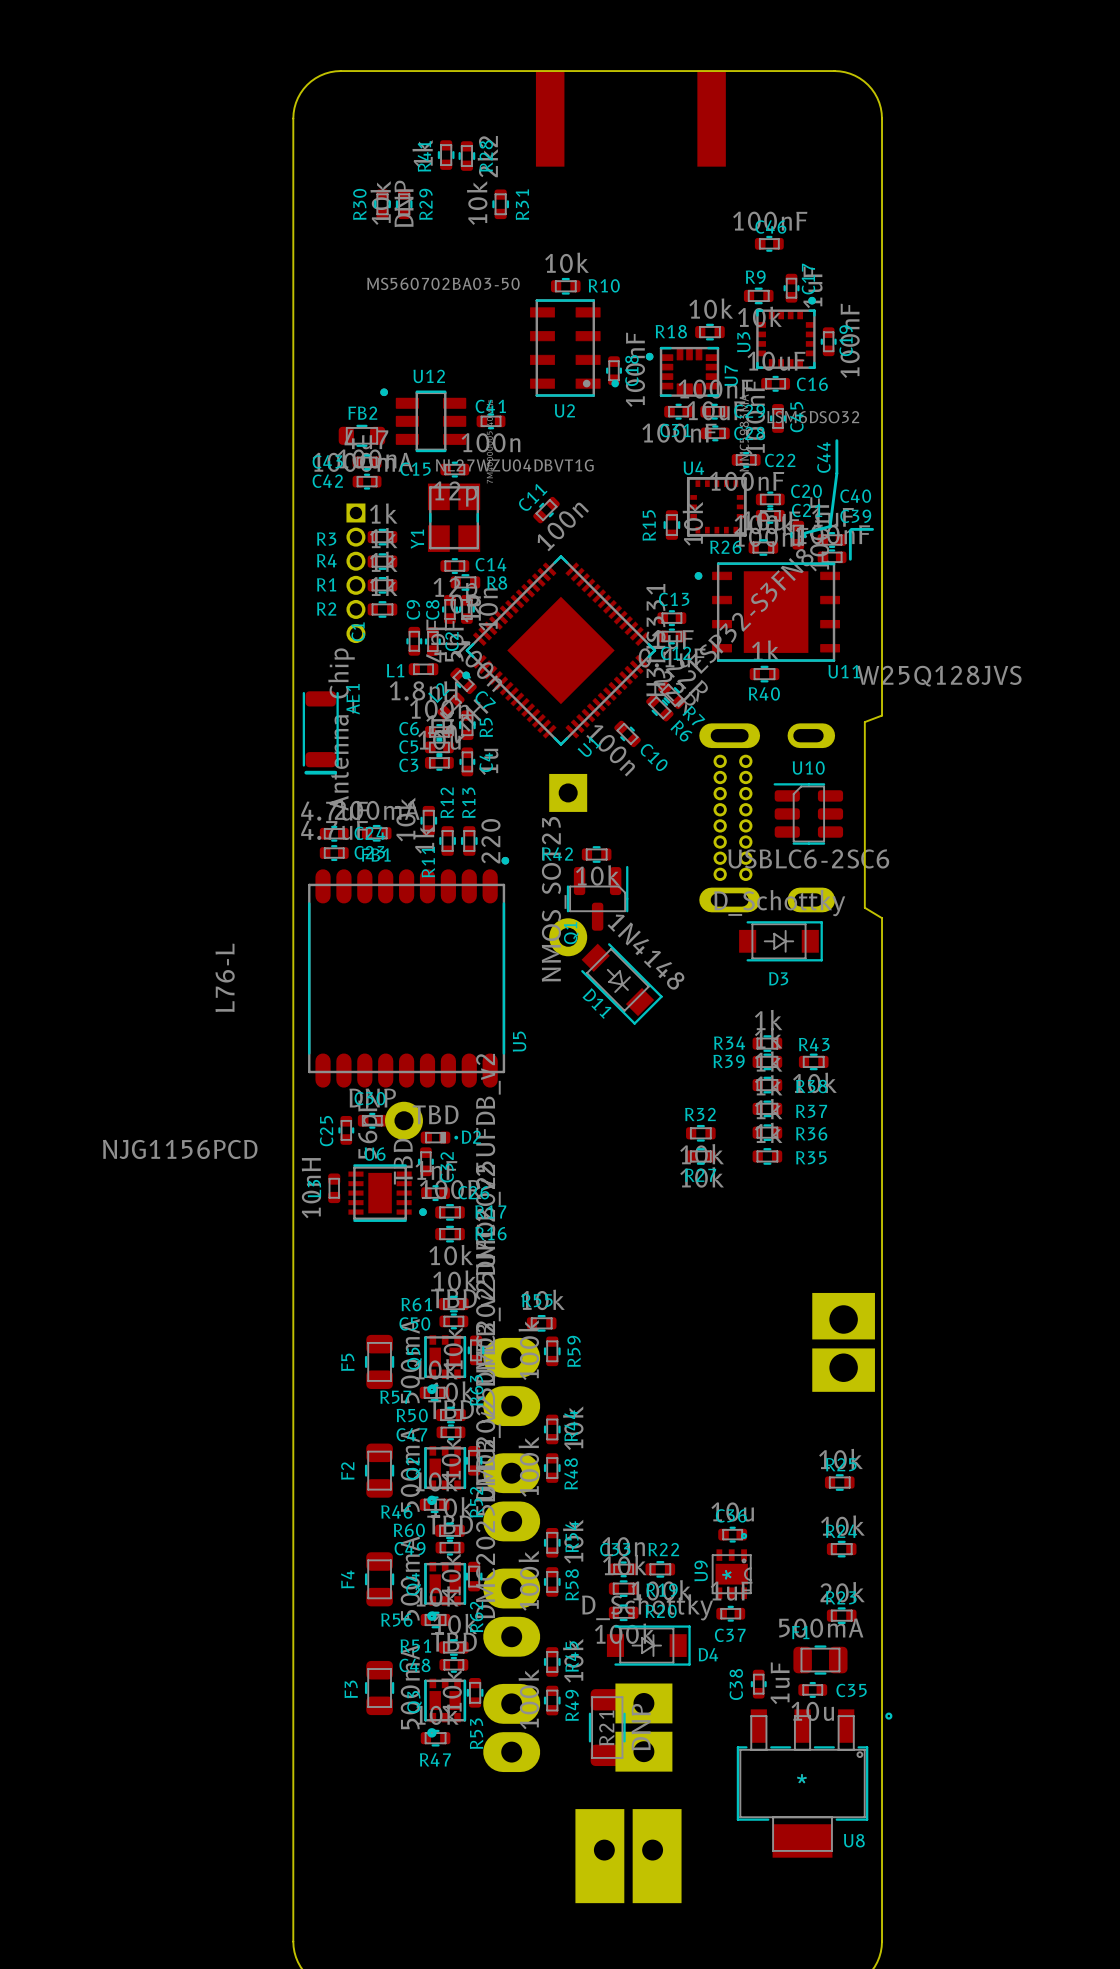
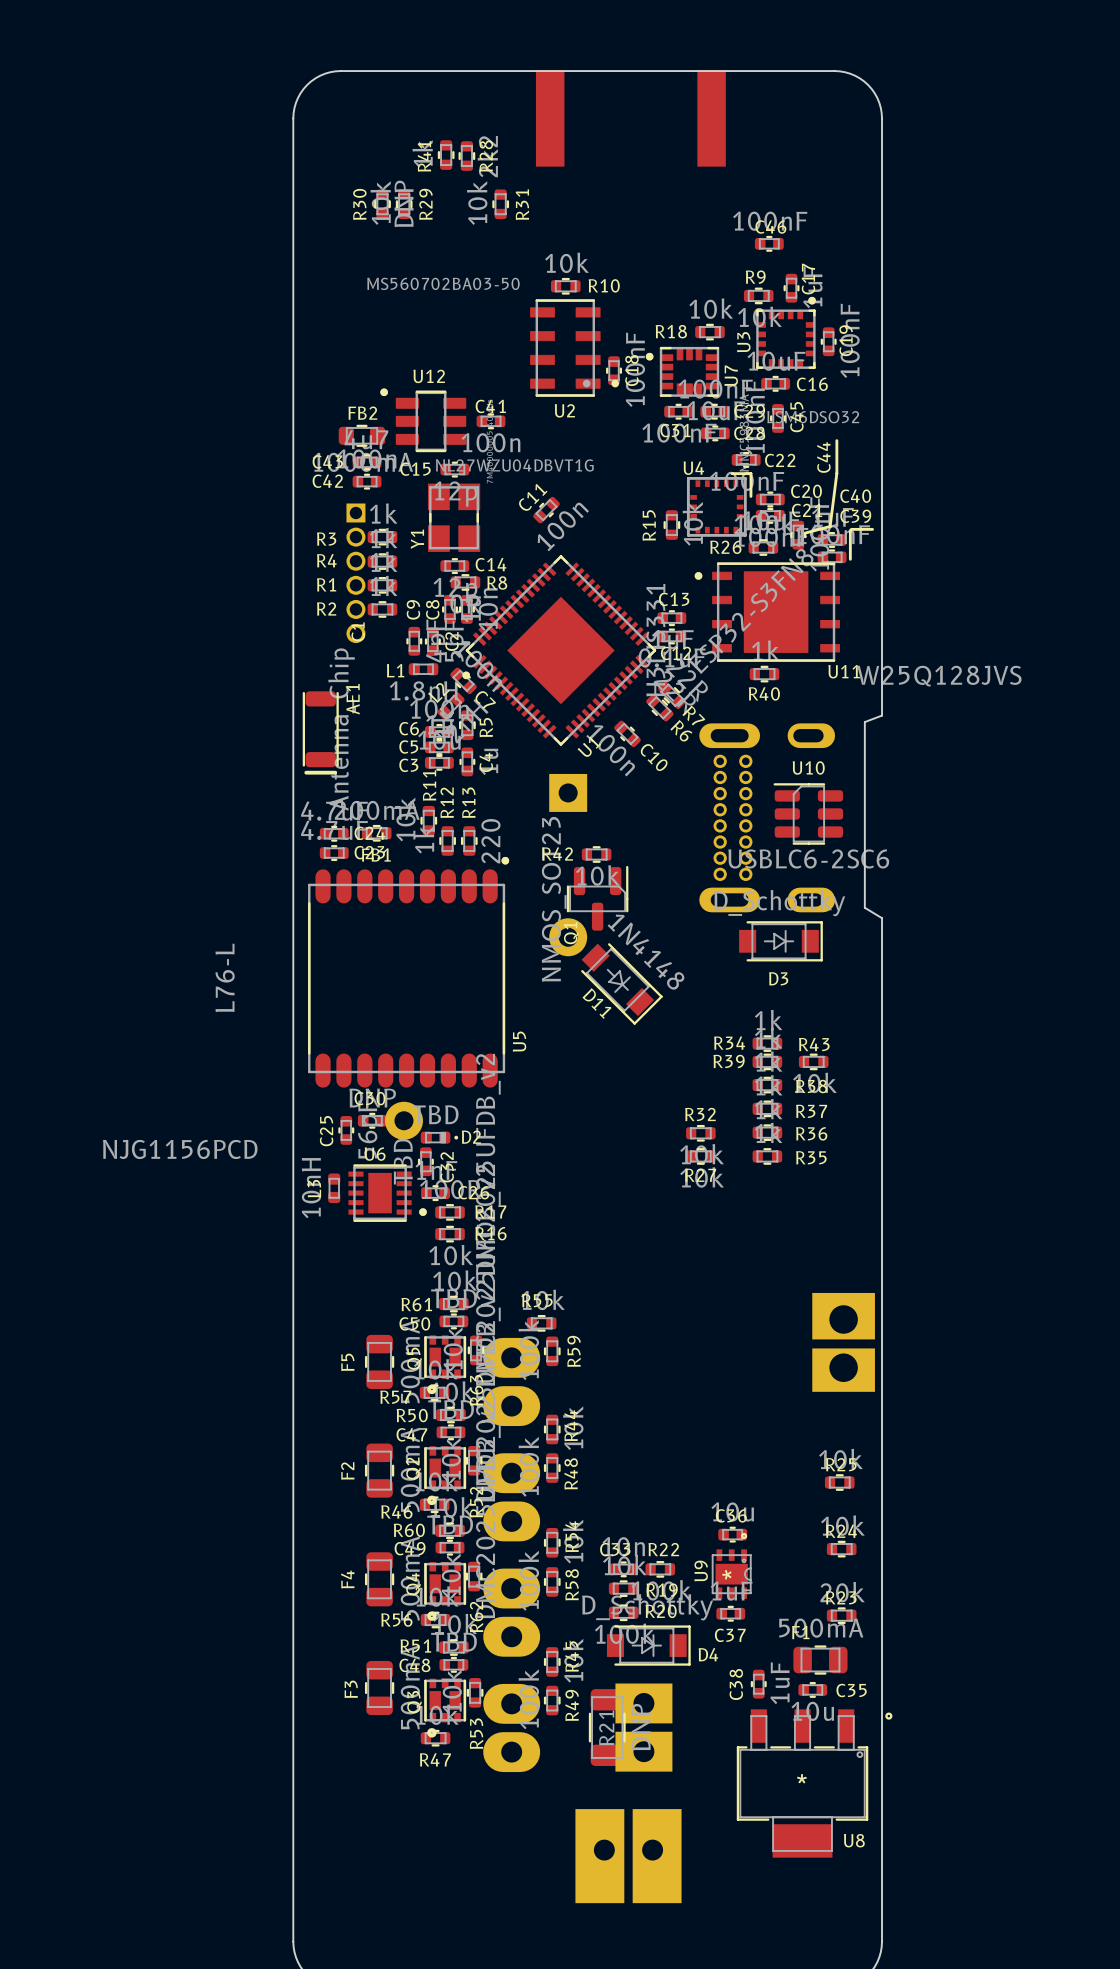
line: none -> (731, 473) (750, 473) (750, 496)
R11 name position: R11 (428, 862) -> R11 (429, 785)

